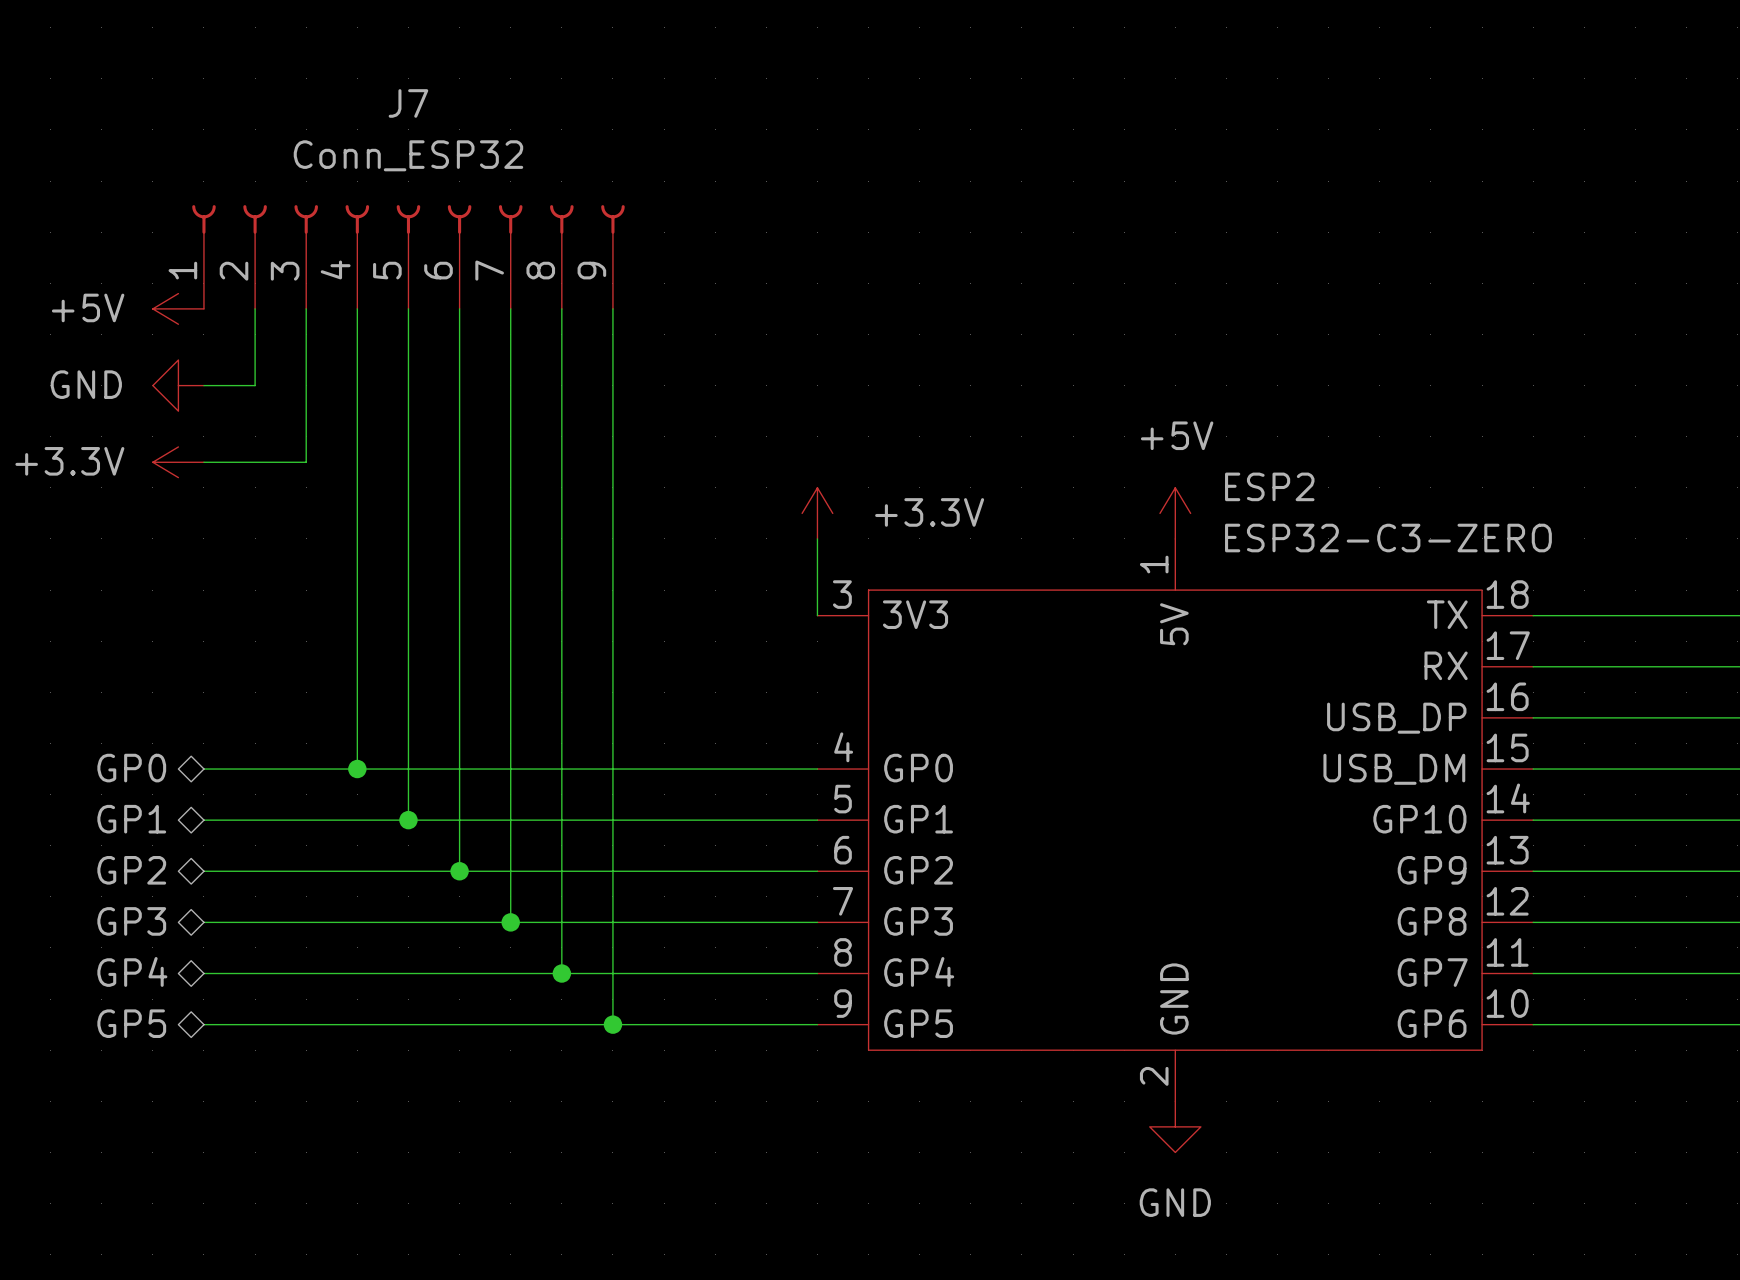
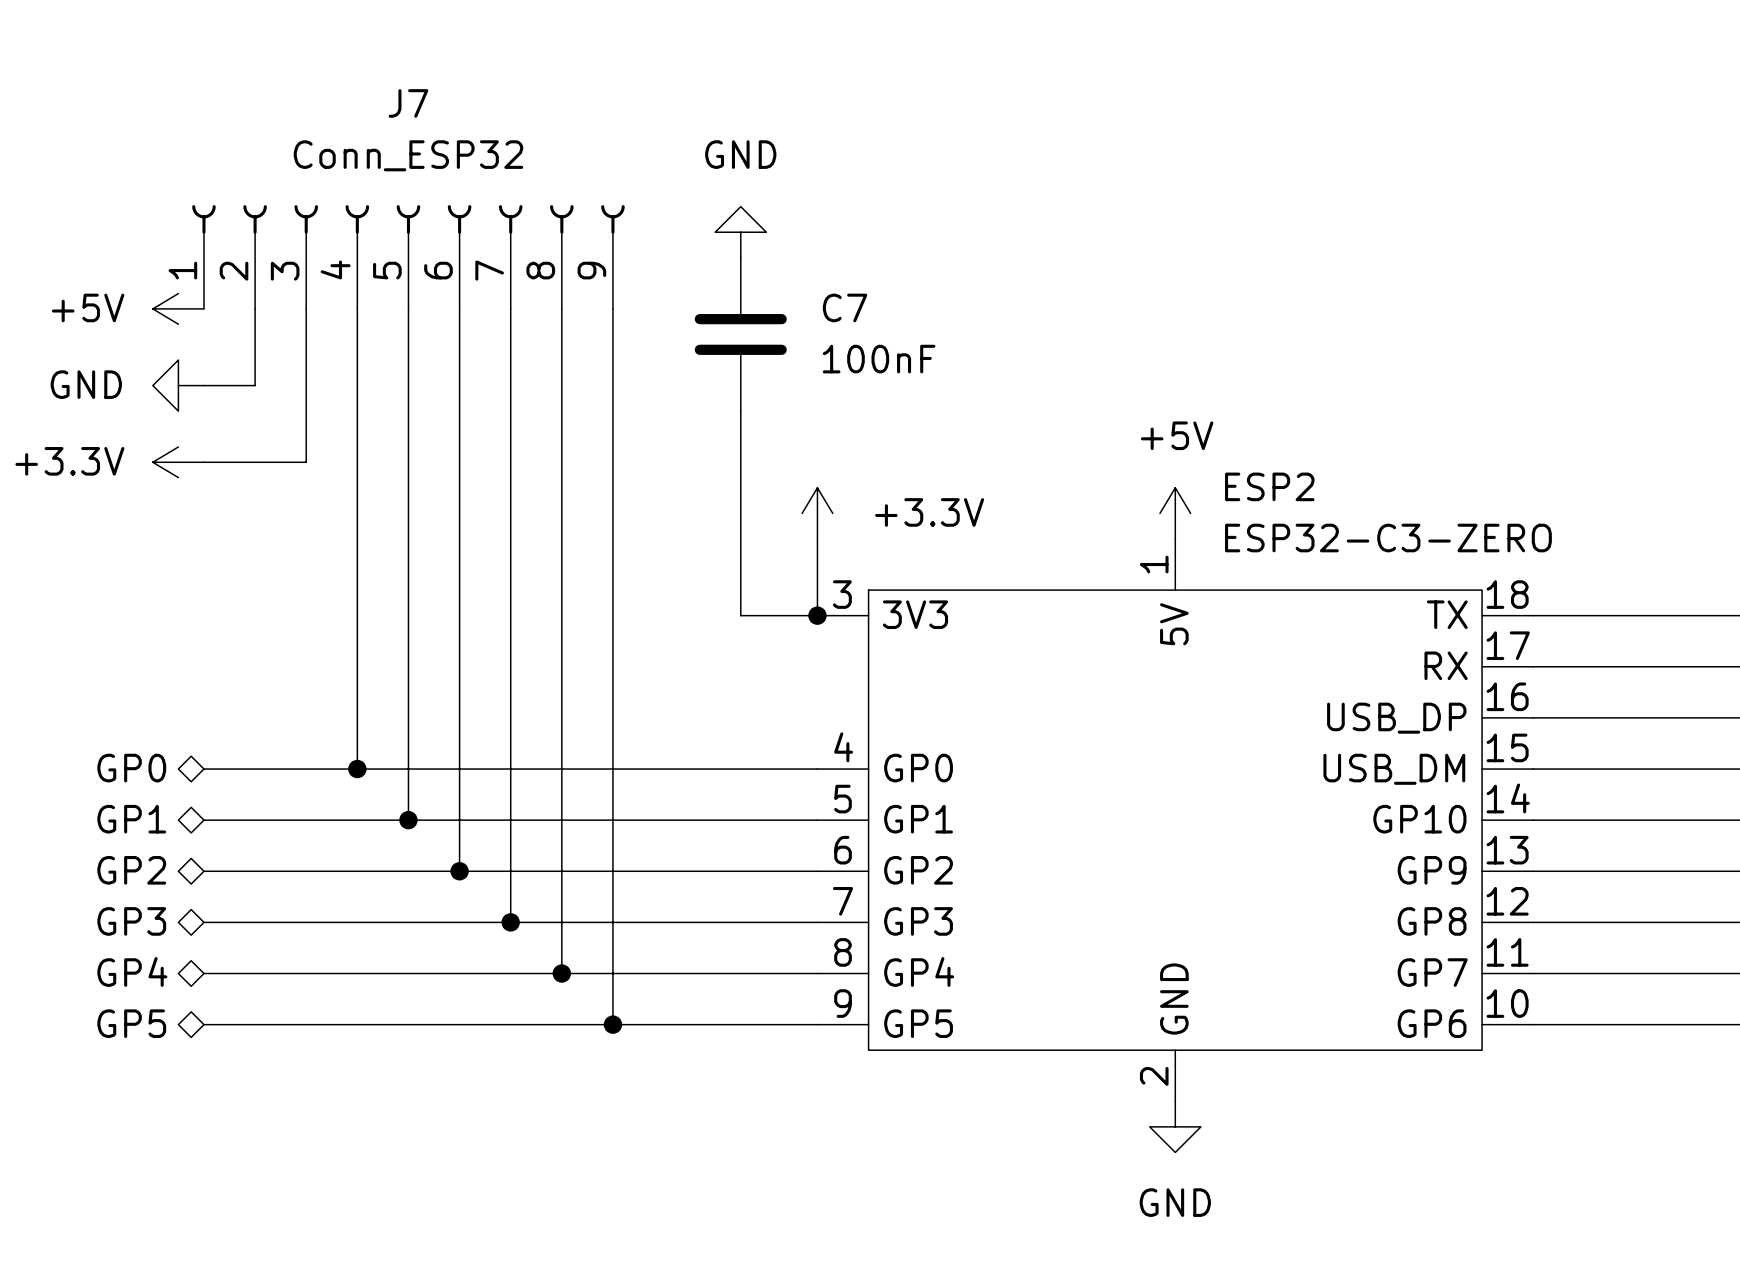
power symbol: none -> GND (740, 232)
C7: none -> 100nF (740, 334)
wire: none -> (740, 411) (740, 615) (817, 615)
junction: none -> (817, 615)

